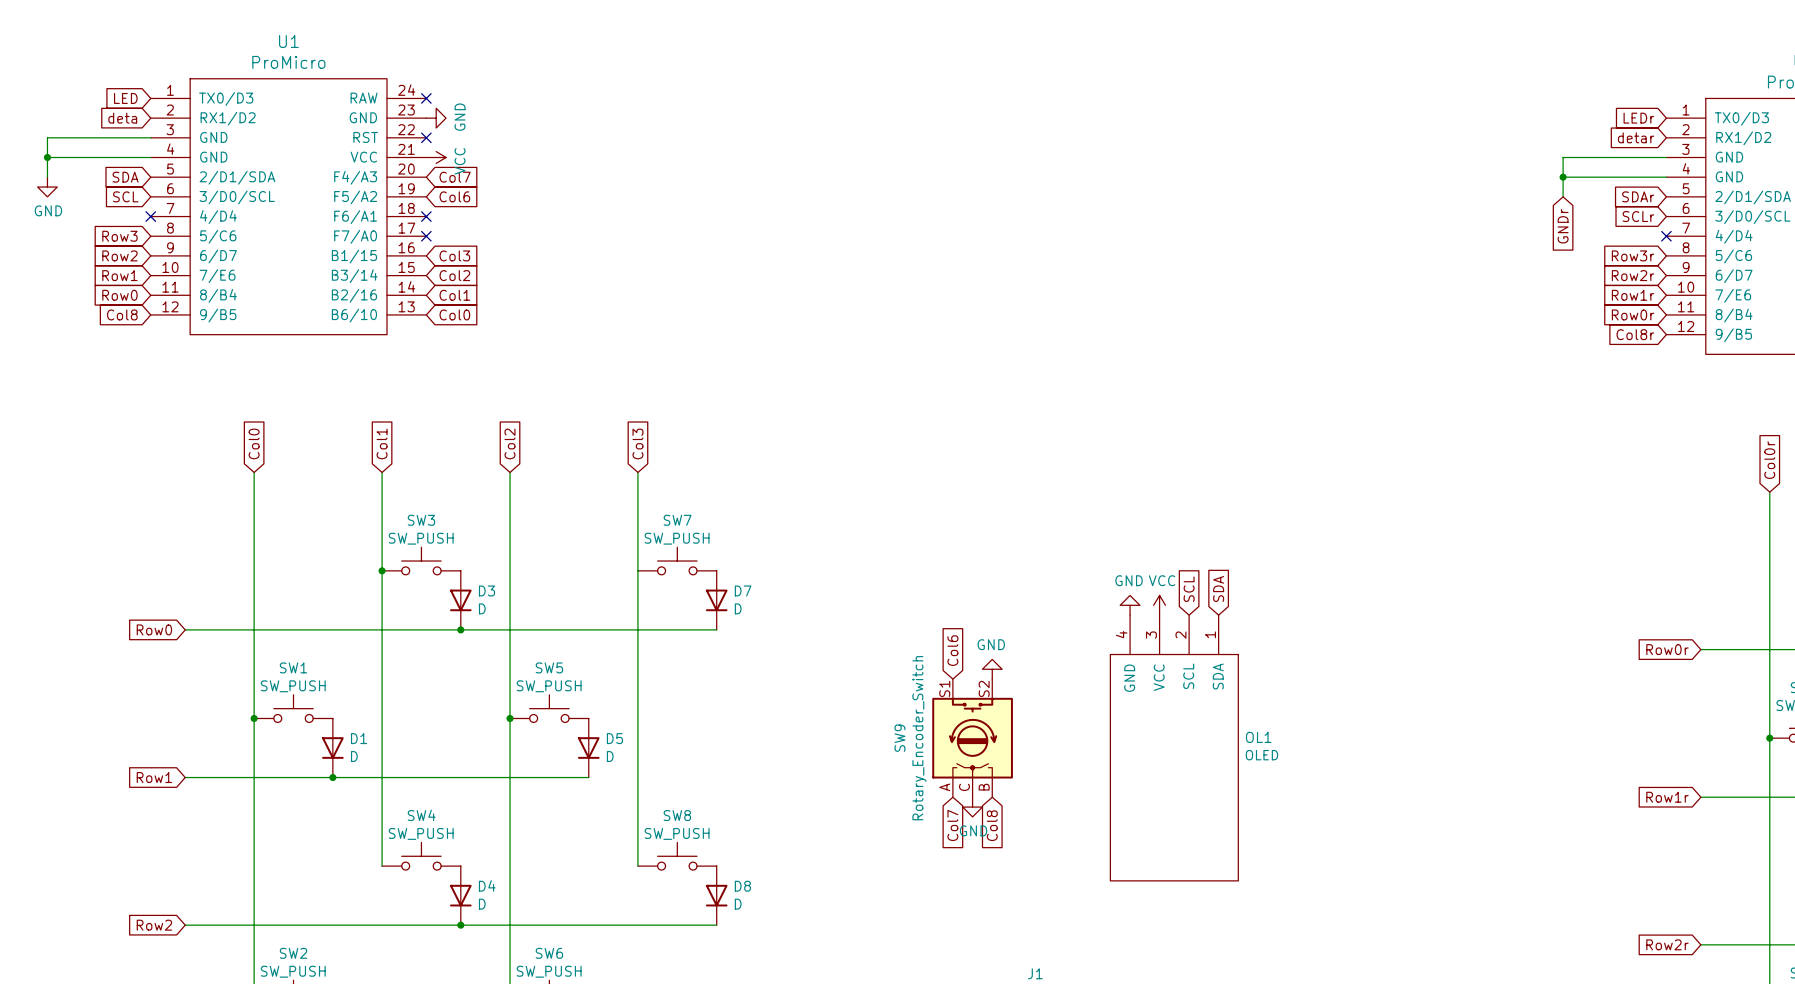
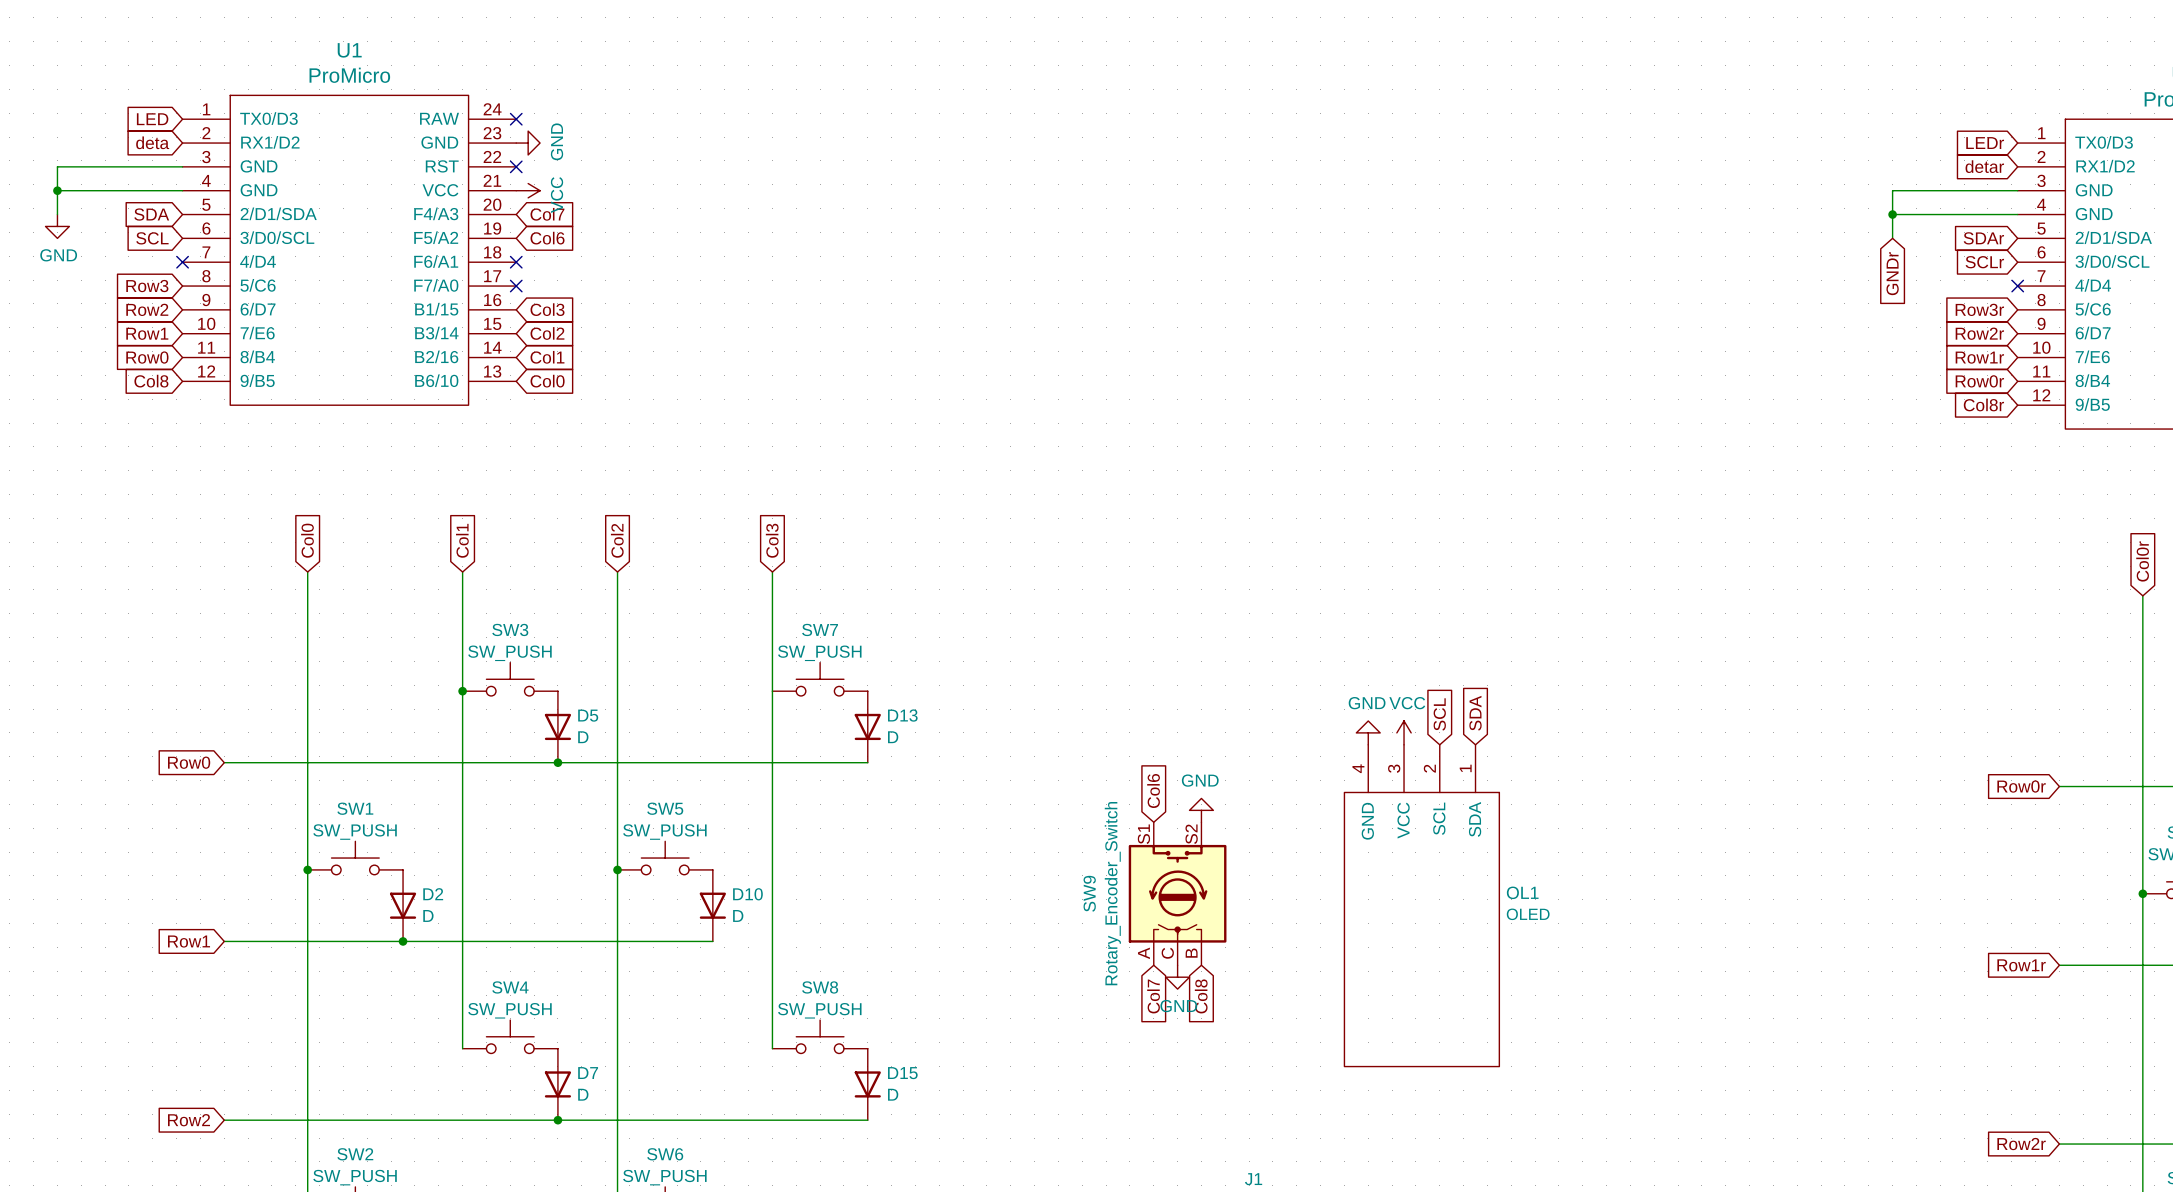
D3 name: D3 (486, 590) -> D5 (588, 715)
D7 name: D7 (743, 590) -> D13 (902, 715)
D1 name: D1 (359, 738) -> D2 (433, 894)
D5 name: D5 (614, 738) -> D10 (747, 894)
D4 name: D4 (487, 885) -> D7 (588, 1073)
D8 name: D8 (742, 886) -> D15 (902, 1073)

